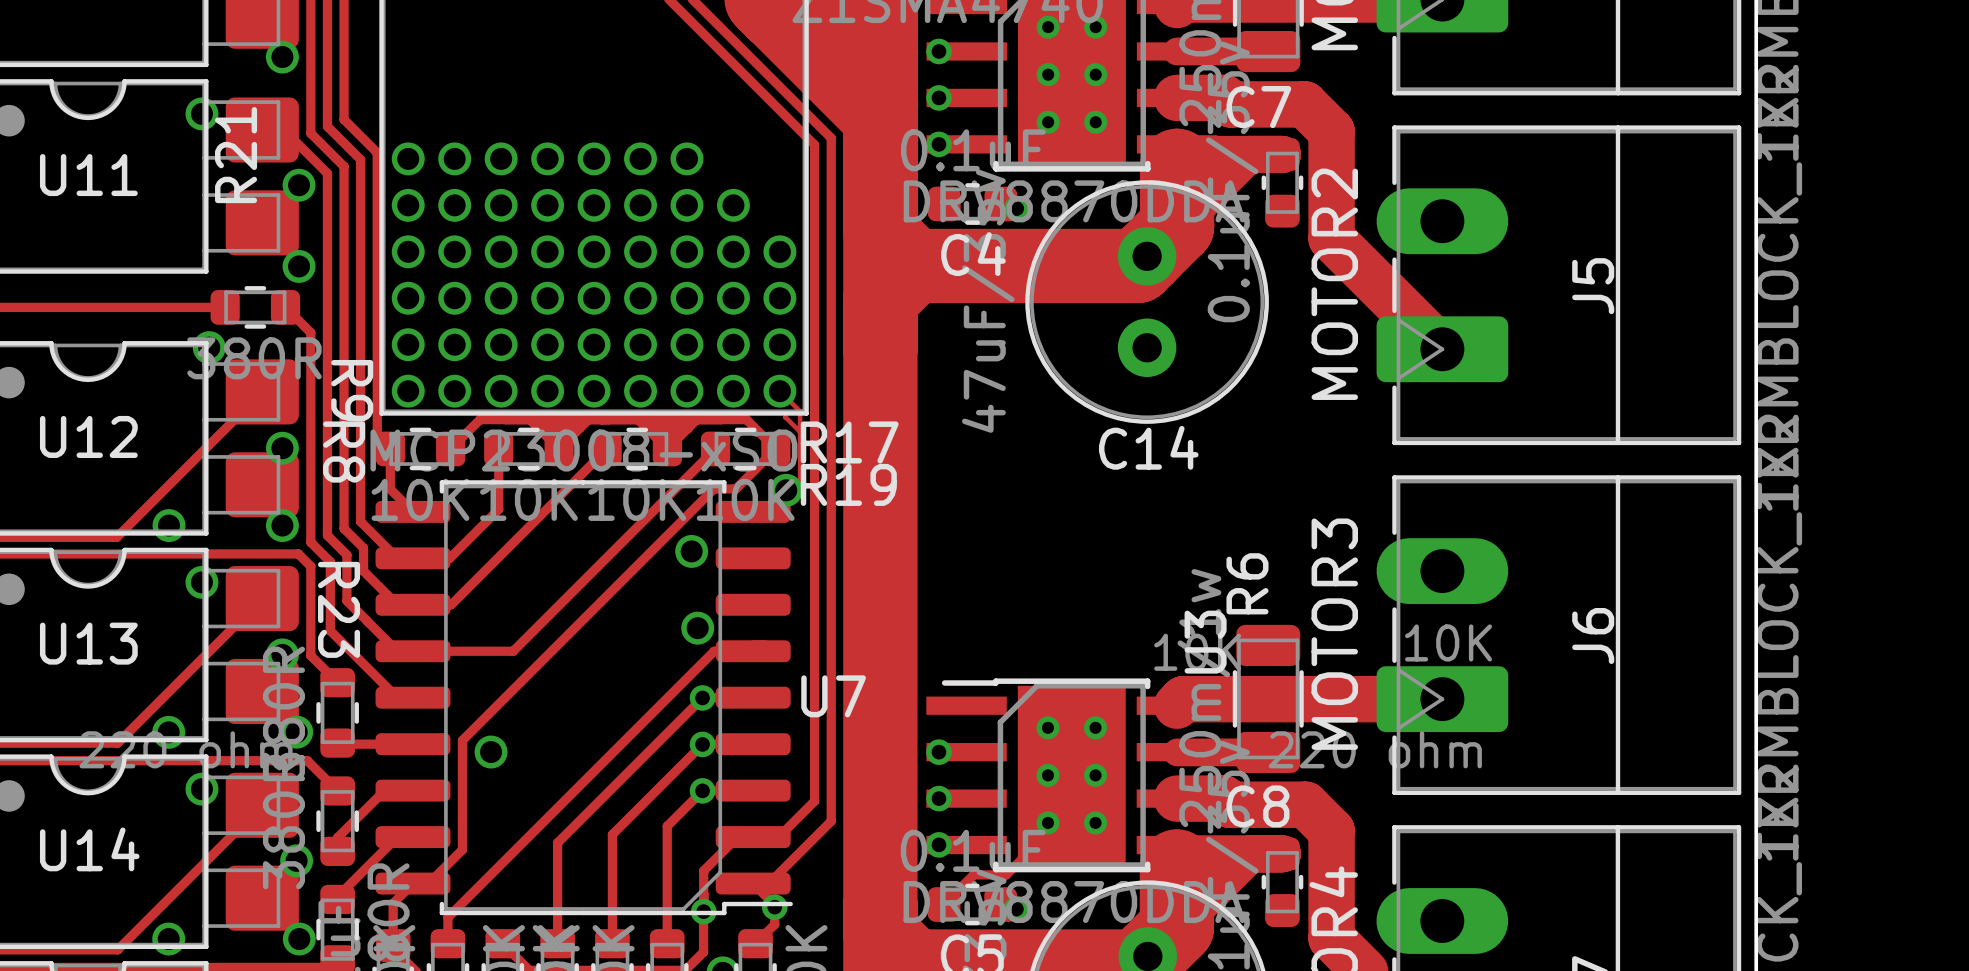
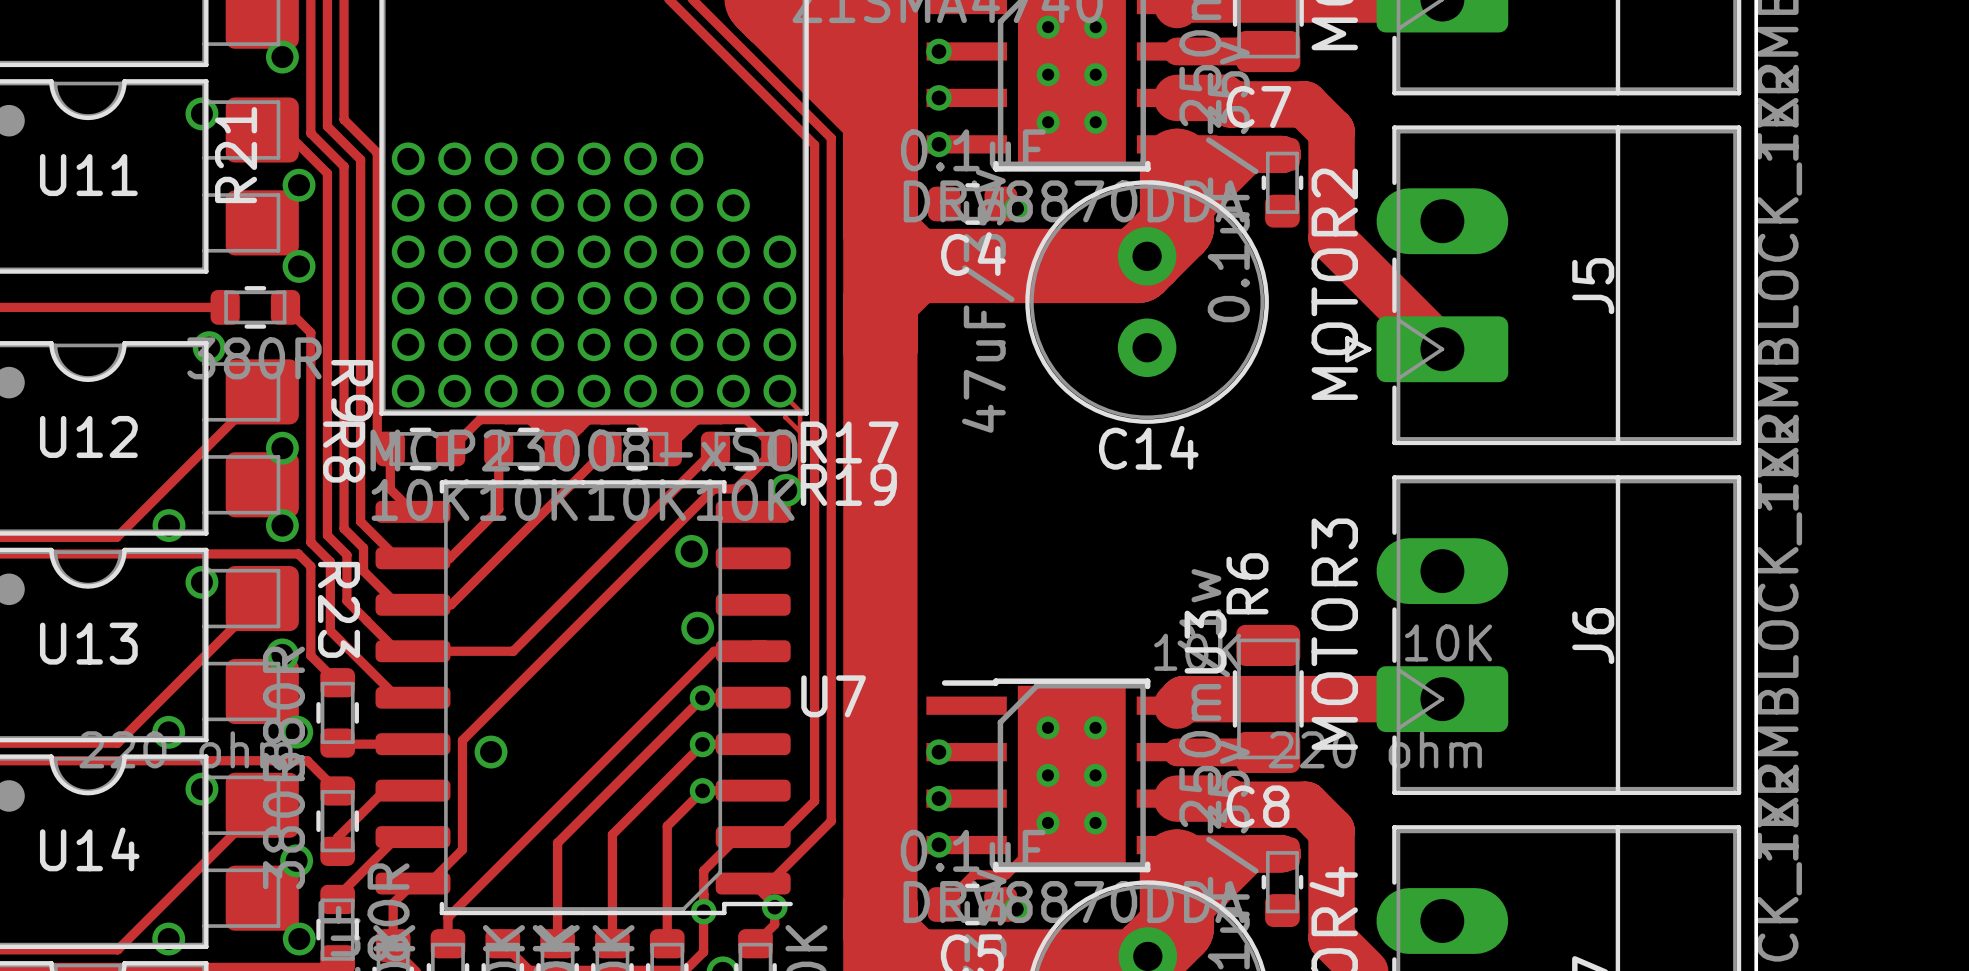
J5 footprint: [1376, 125, 1742, 446] -> [1345, 125, 1742, 446]

